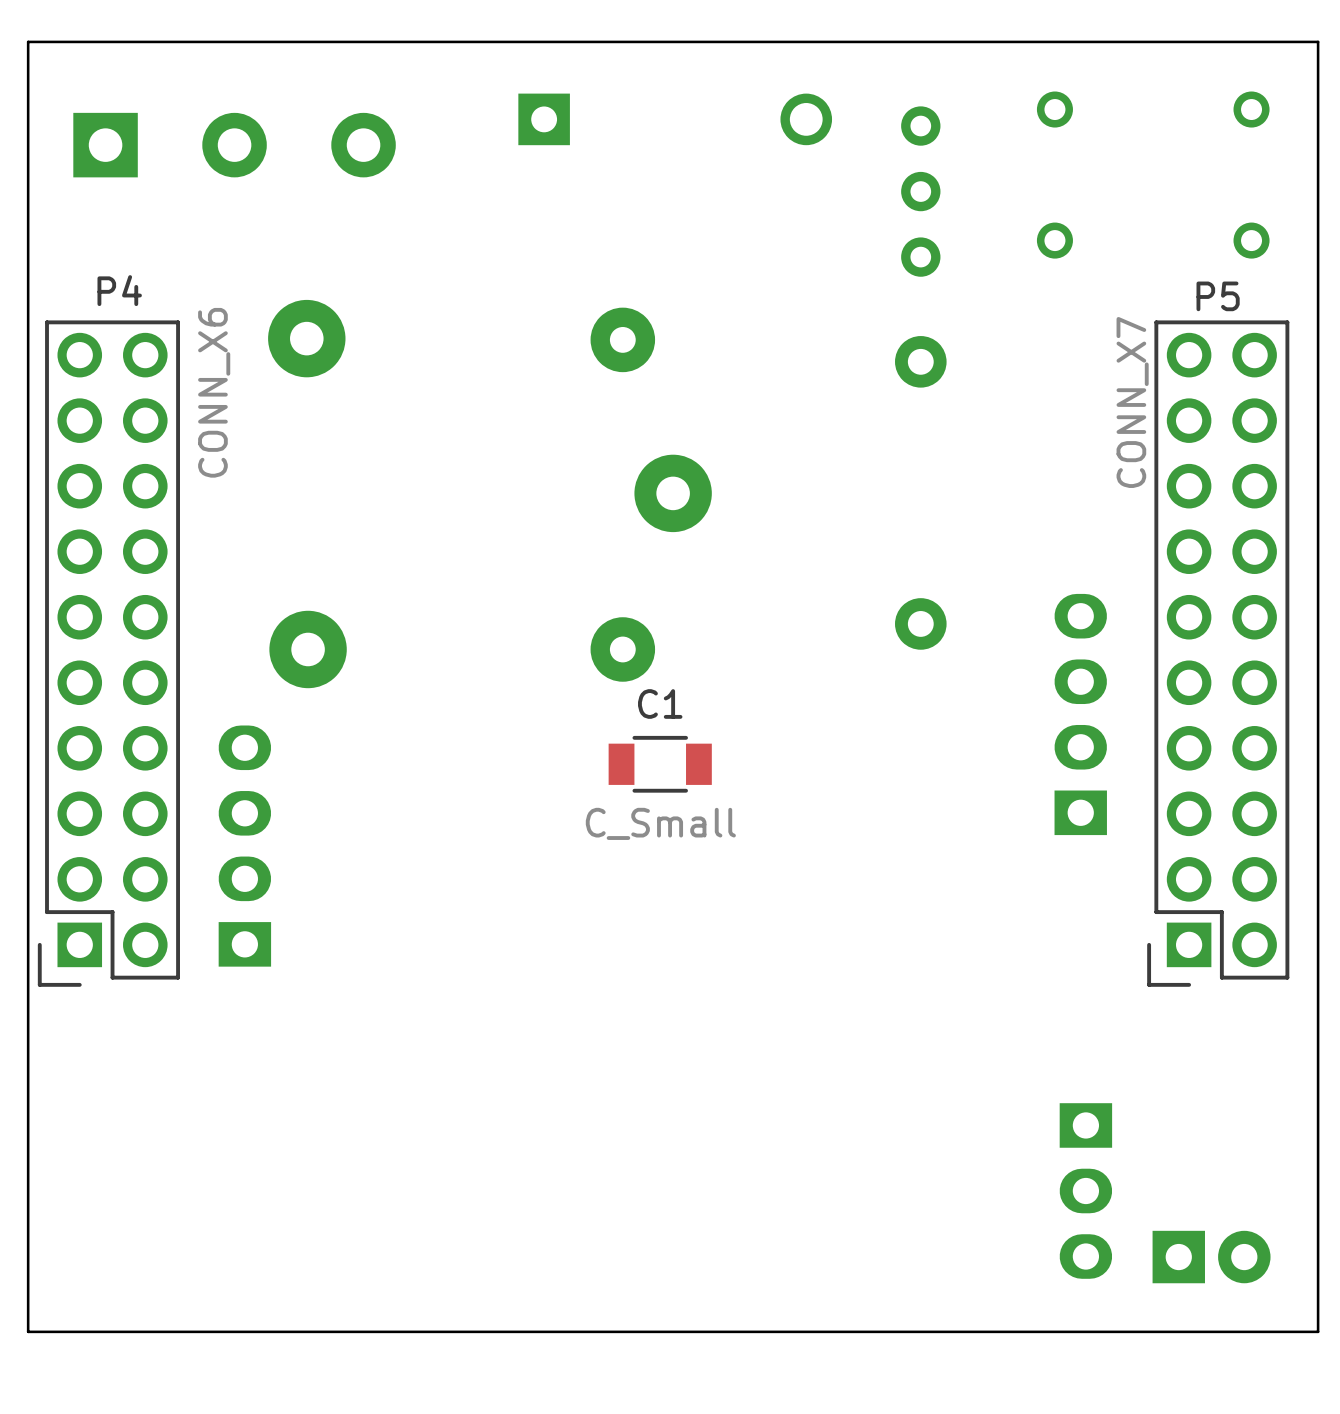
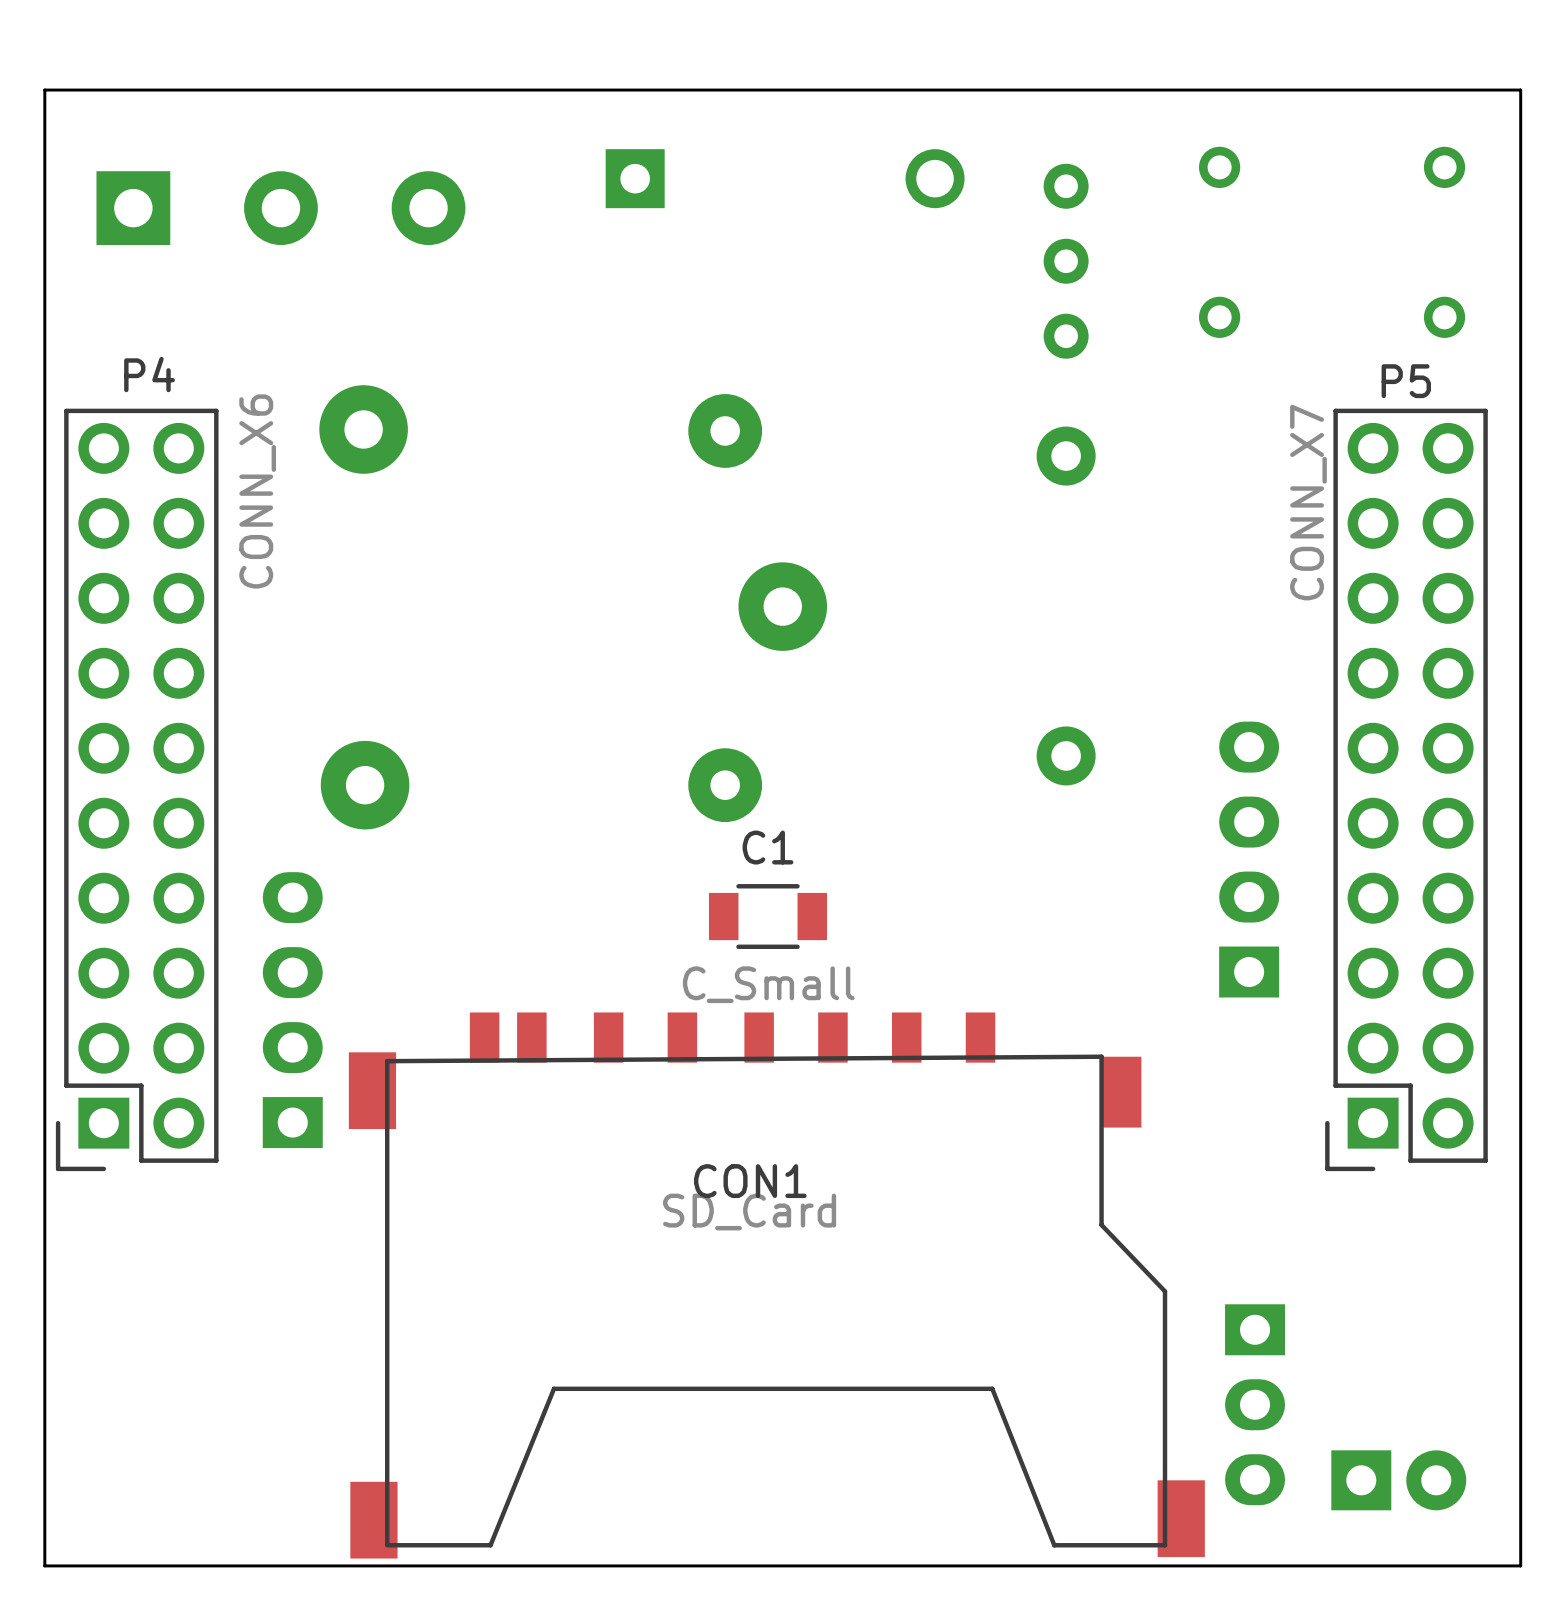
CON1: none -> SD_Card (776, 1285)

